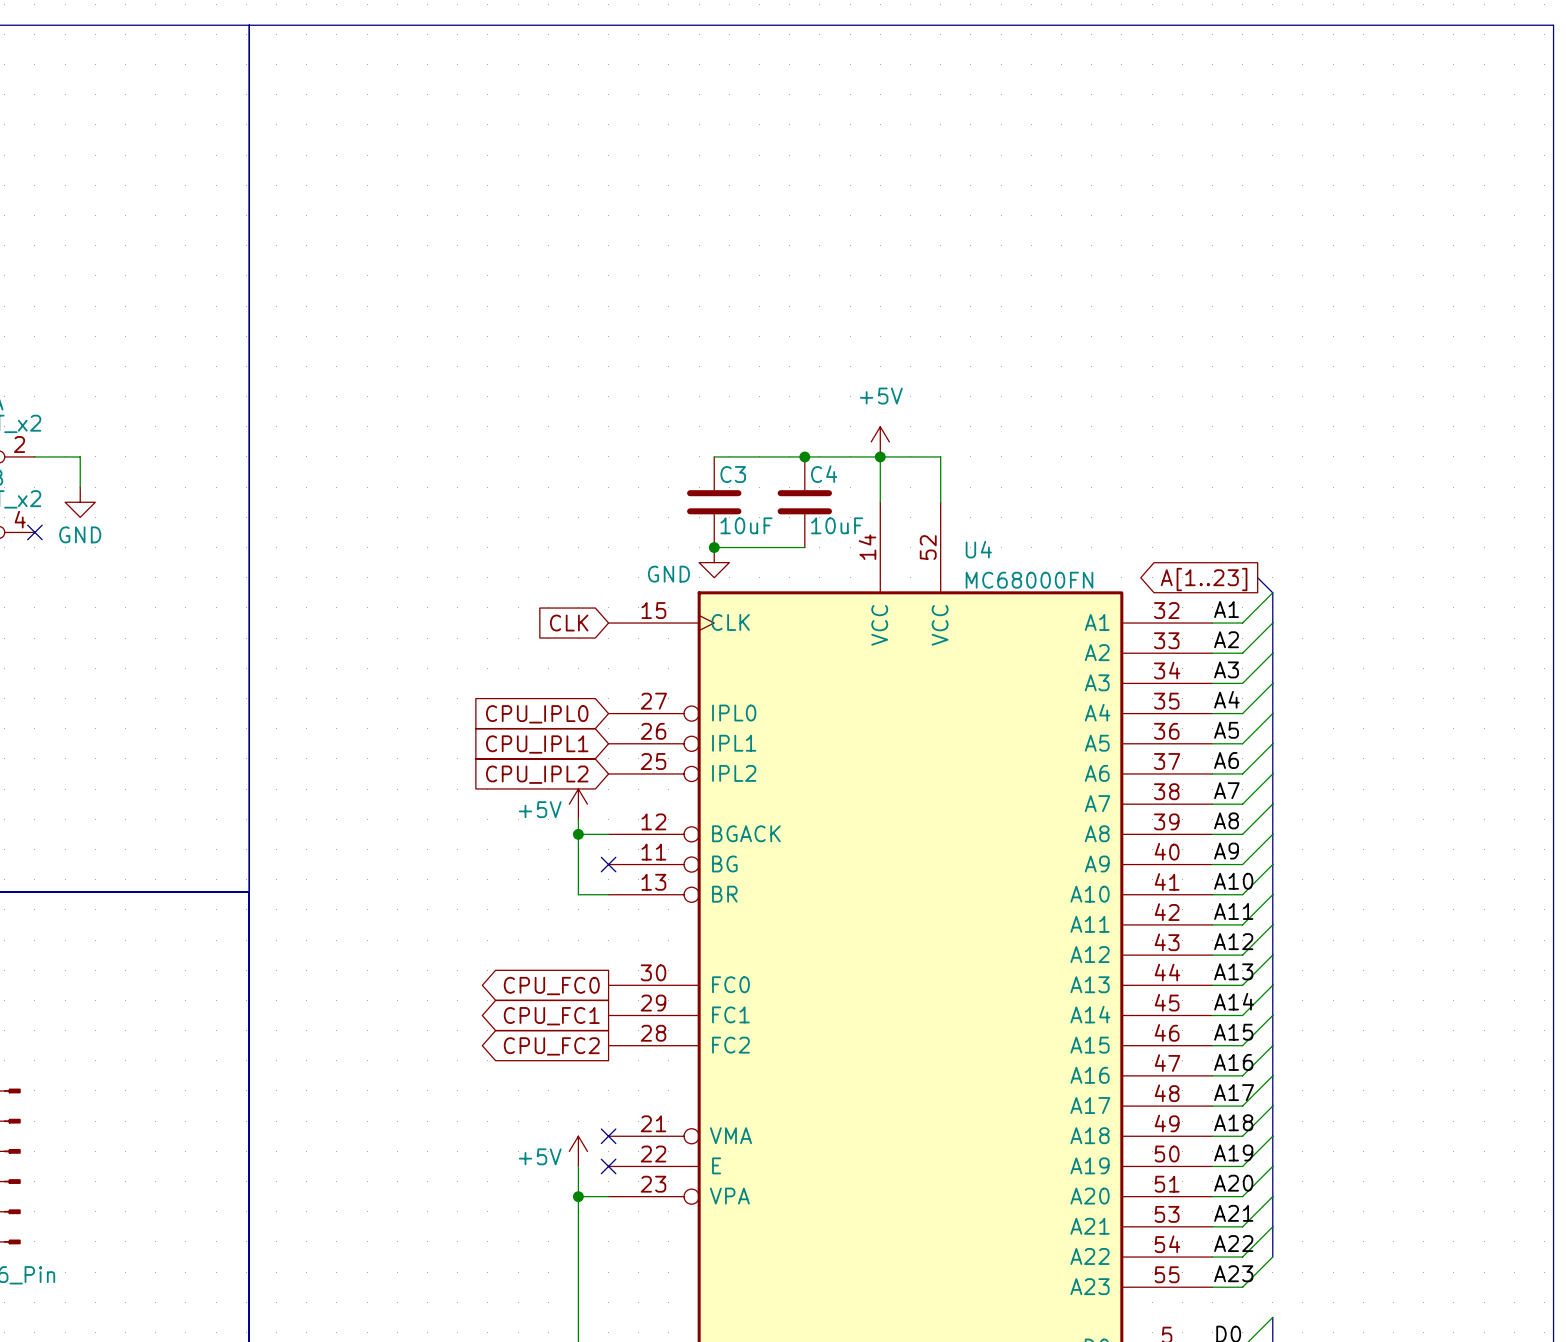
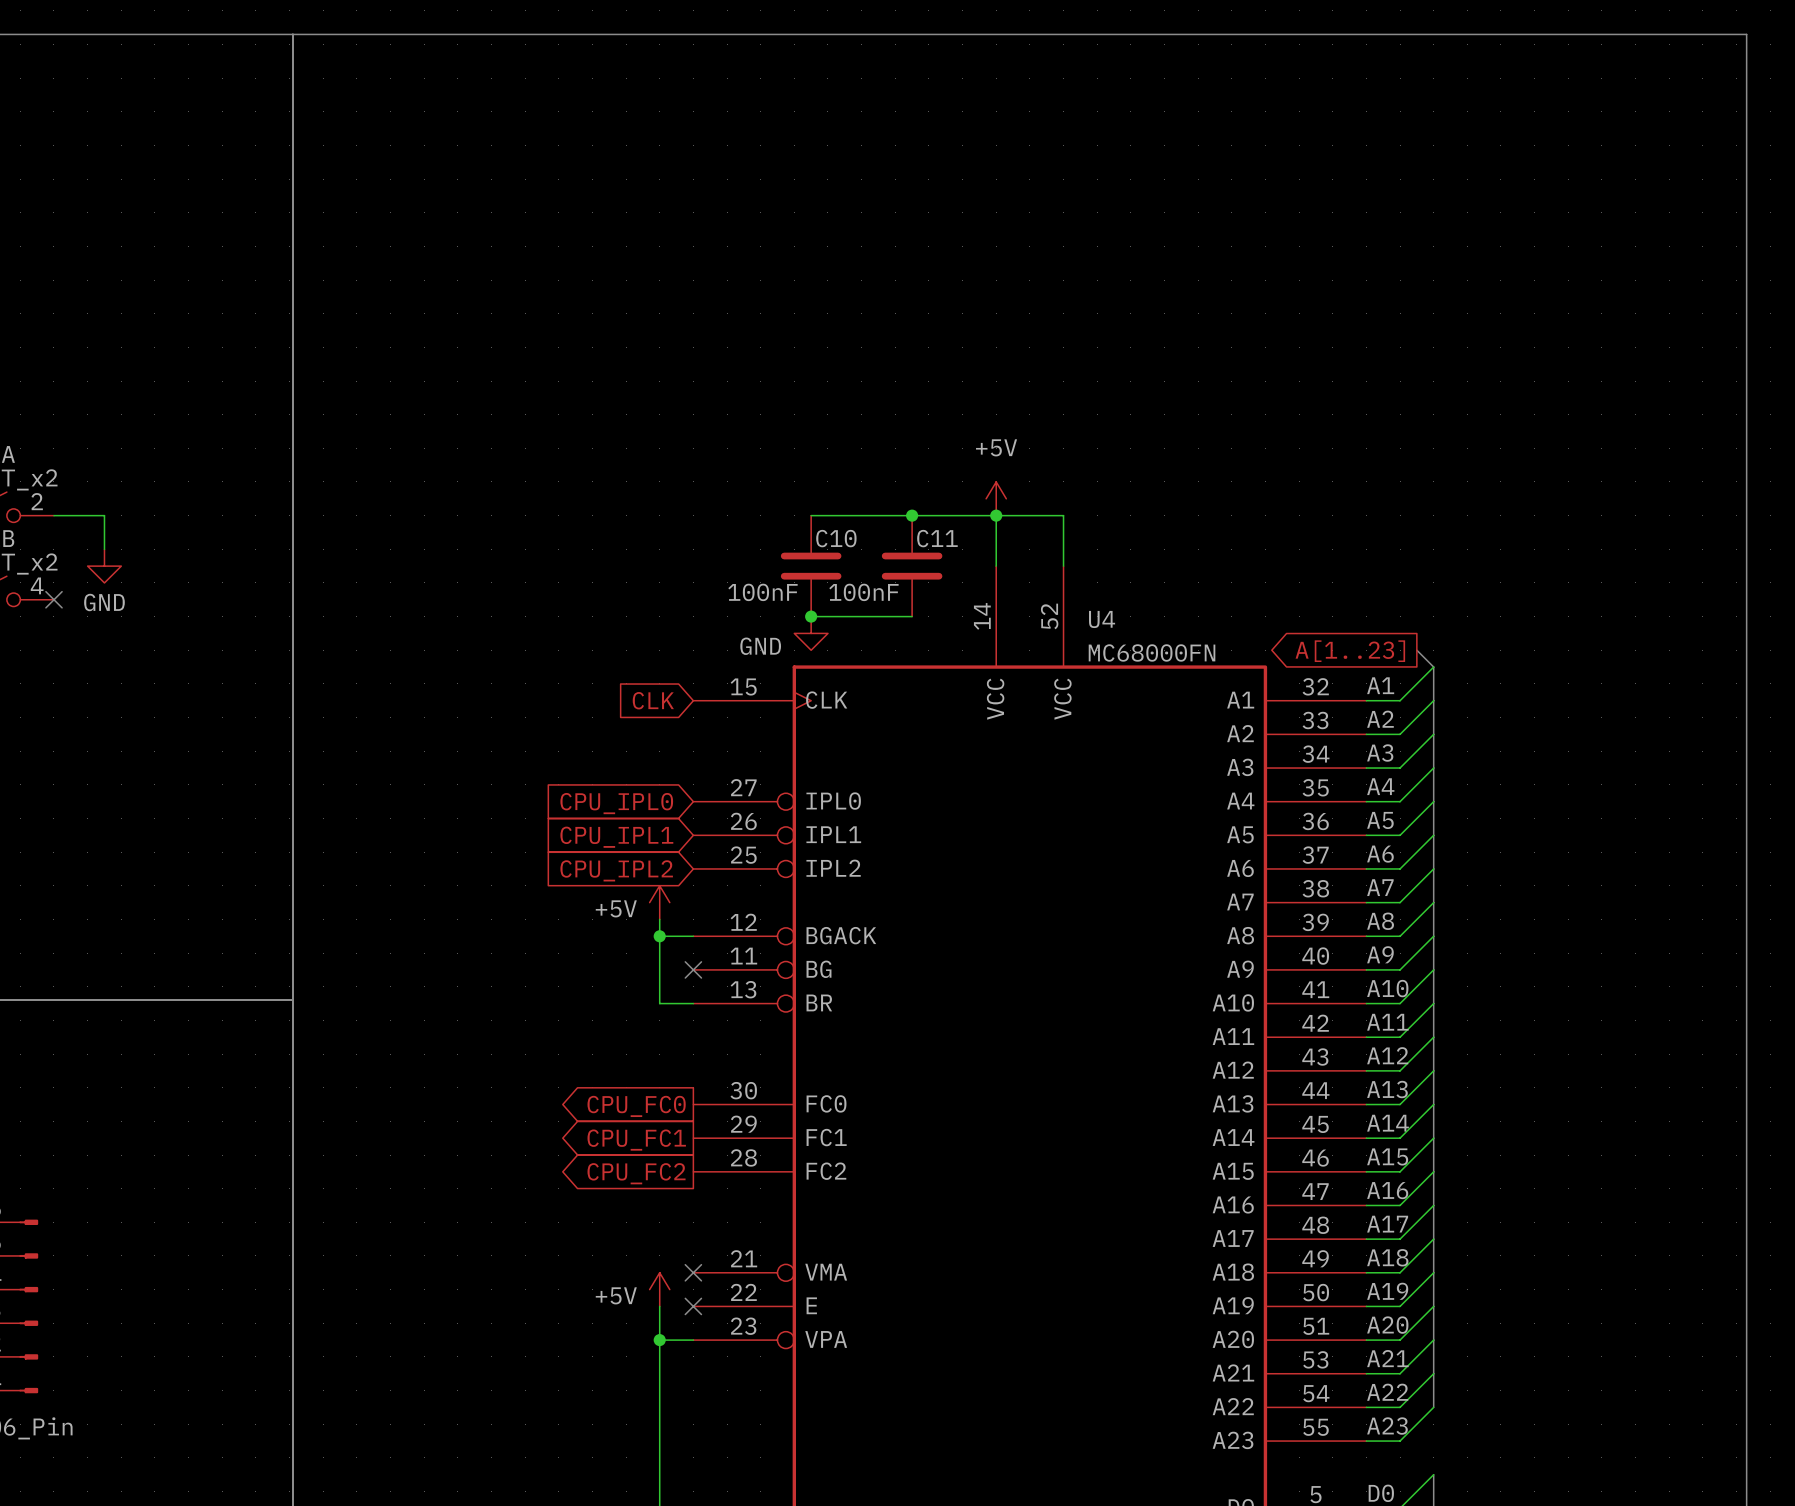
C3 name: C3 (733, 474) -> C10 (836, 538)
C4 name: C4 (824, 474) -> C11 (937, 538)
C3 value: 10uF (746, 525) -> 100nF (762, 592)
C4 value: 10uF (837, 525) -> 100nF (863, 592)

